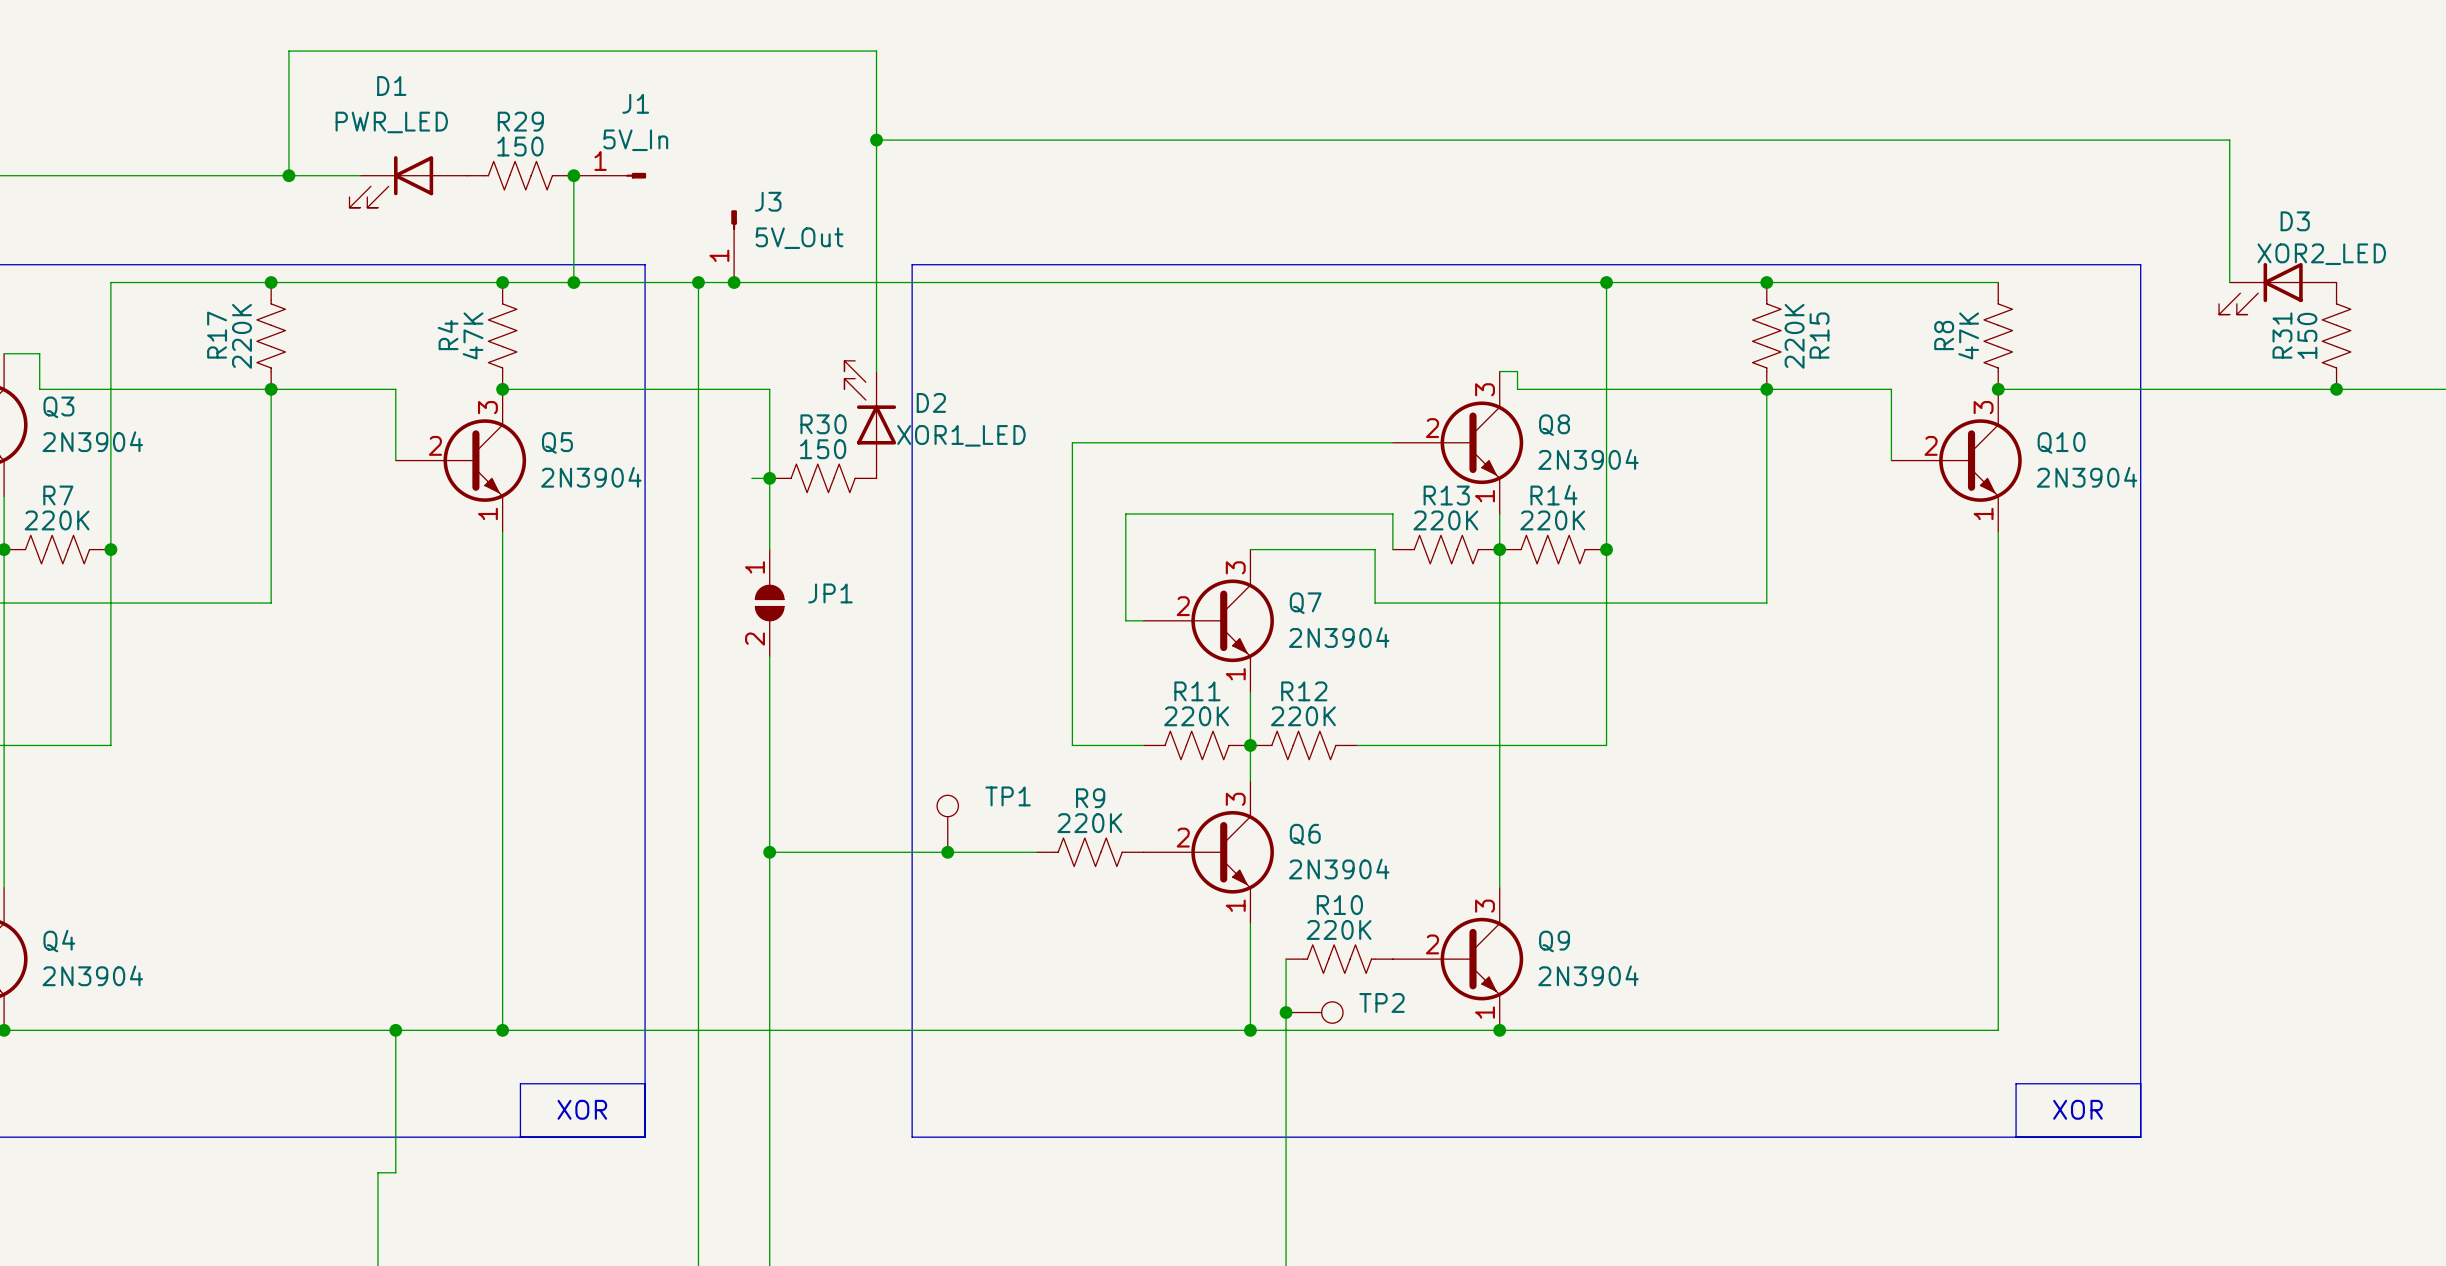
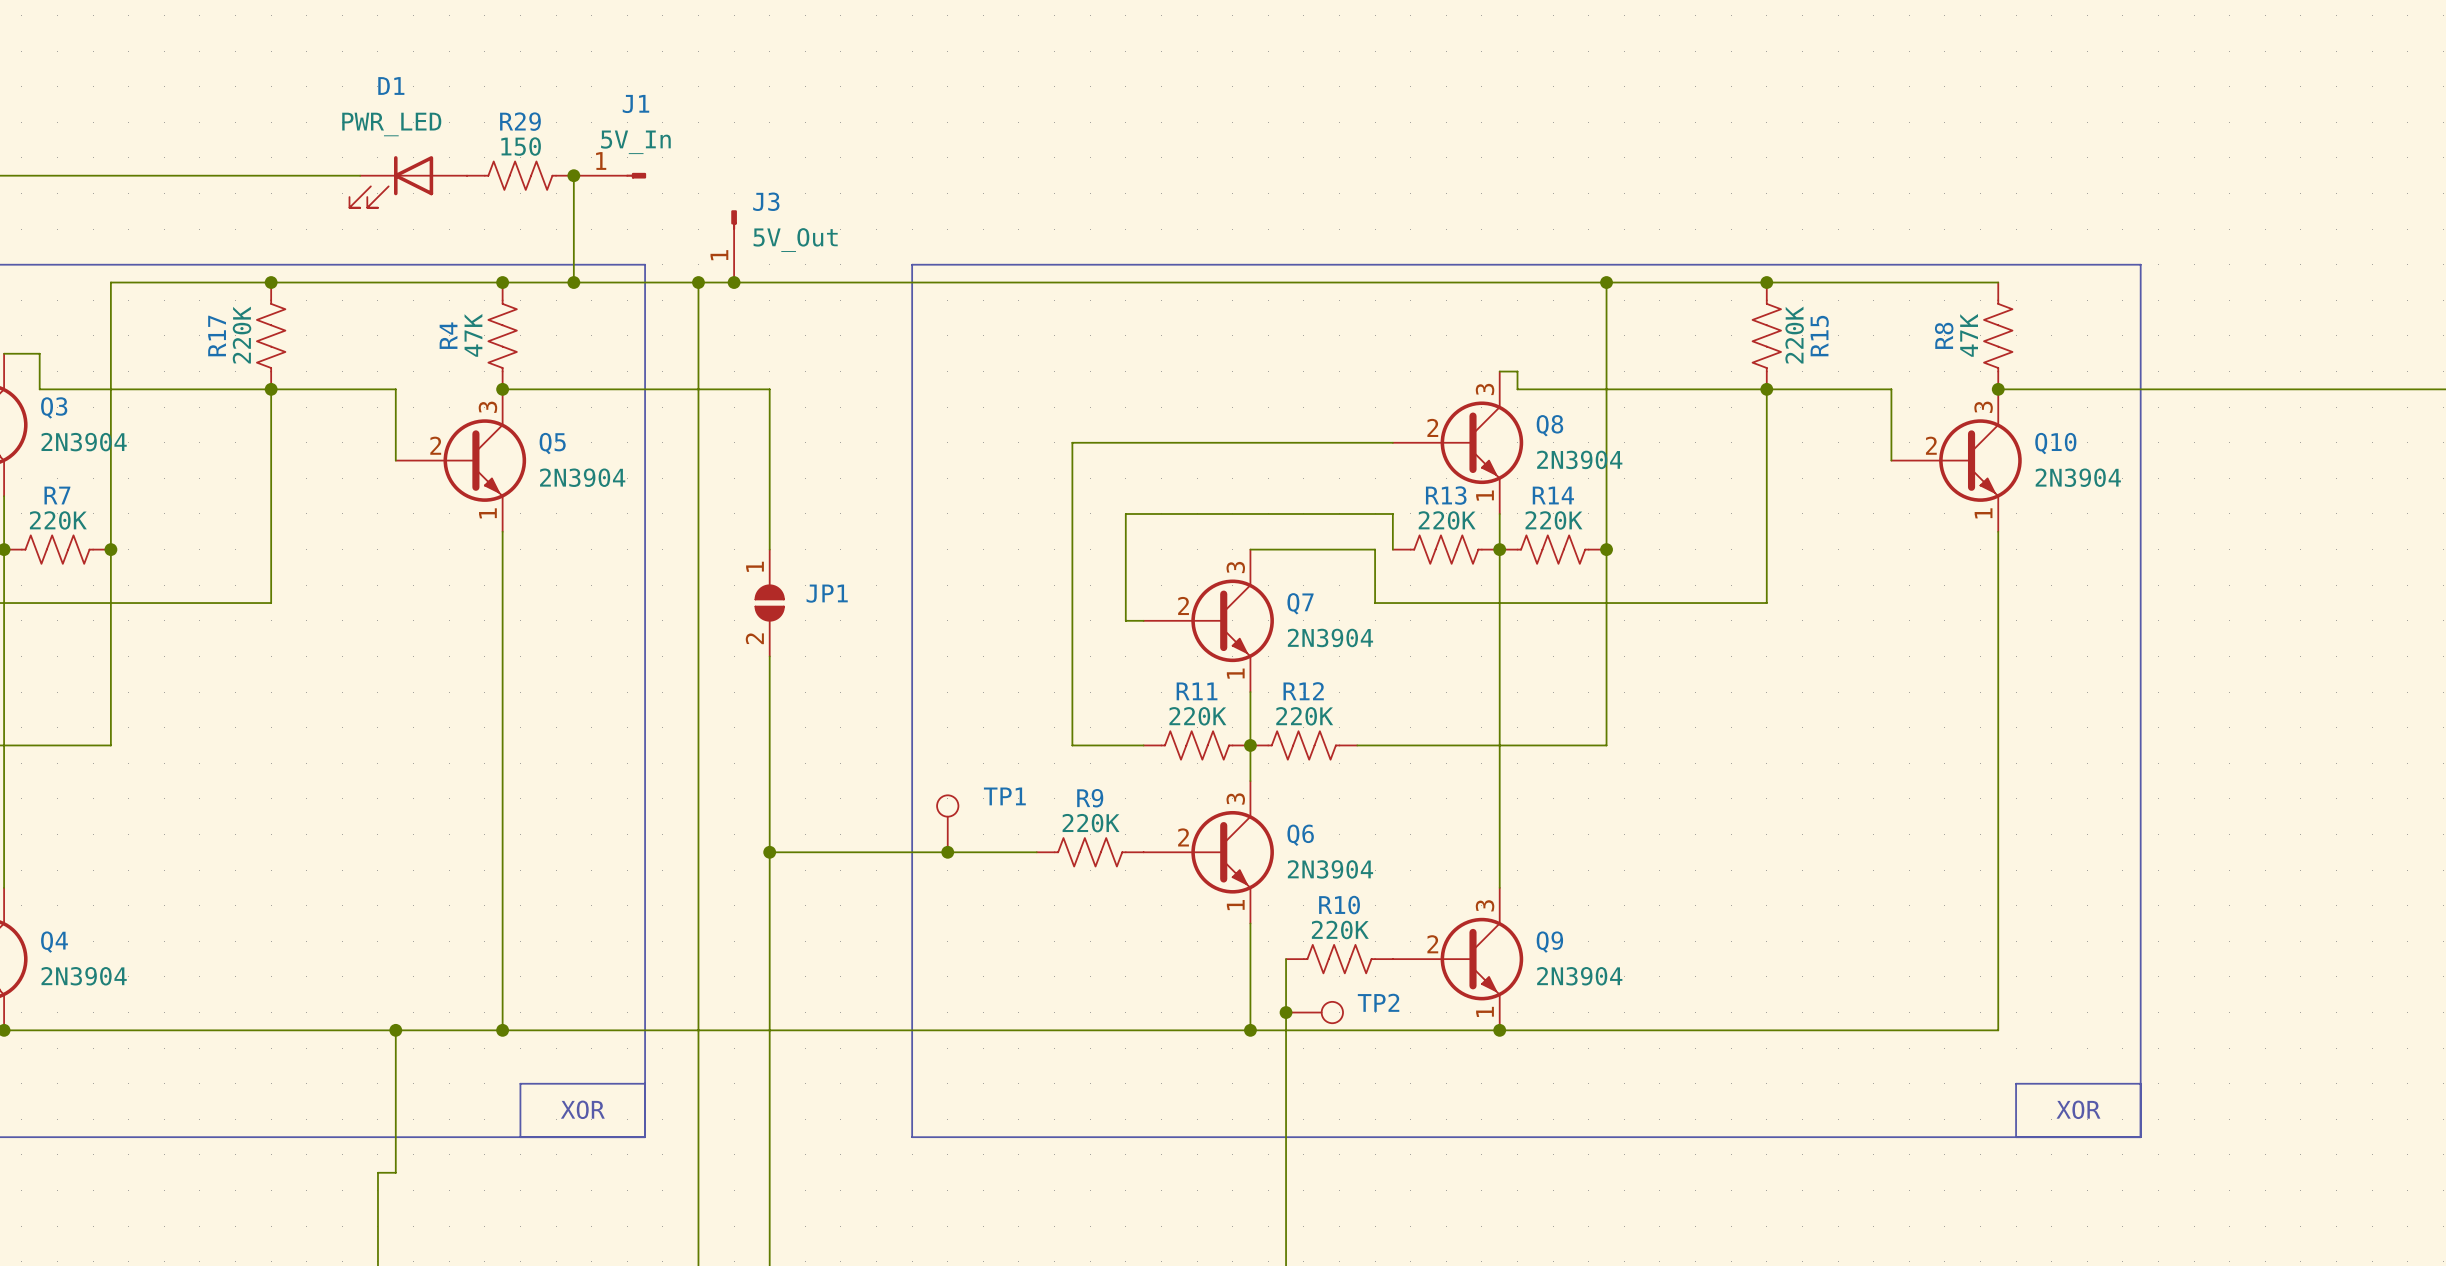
wire: (876, 140) (2229, 140) (2229, 282) -> none
junction: (876, 140) -> none
wire: (288, 175) (288, 51) (876, 51) (876, 371) -> none
junction: (288, 175) -> none
D3: XOR2_LED (2277, 288) -> none
R31: 150 (2336, 335) -> none
junction: (2336, 389) -> none
D2: XOR1_LED (870, 419) -> none
wire: (751, 478) (769, 478) -> none
junction: (769, 478) -> none
R30: 150 (823, 478) -> none

